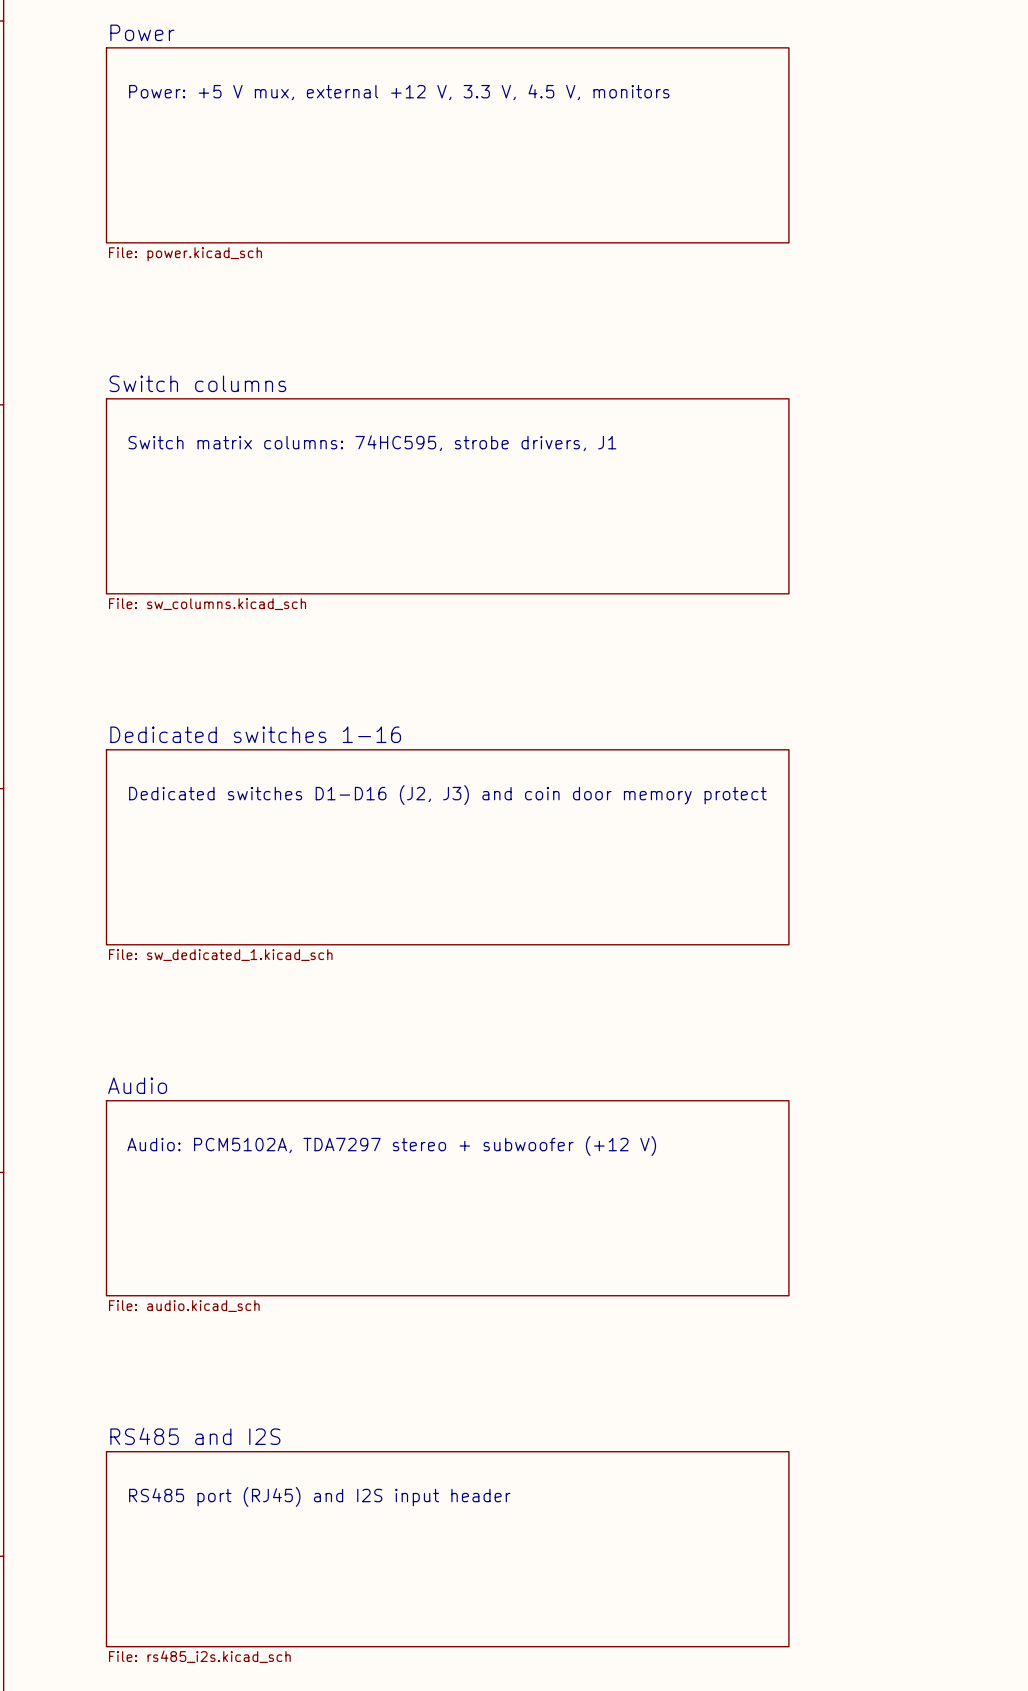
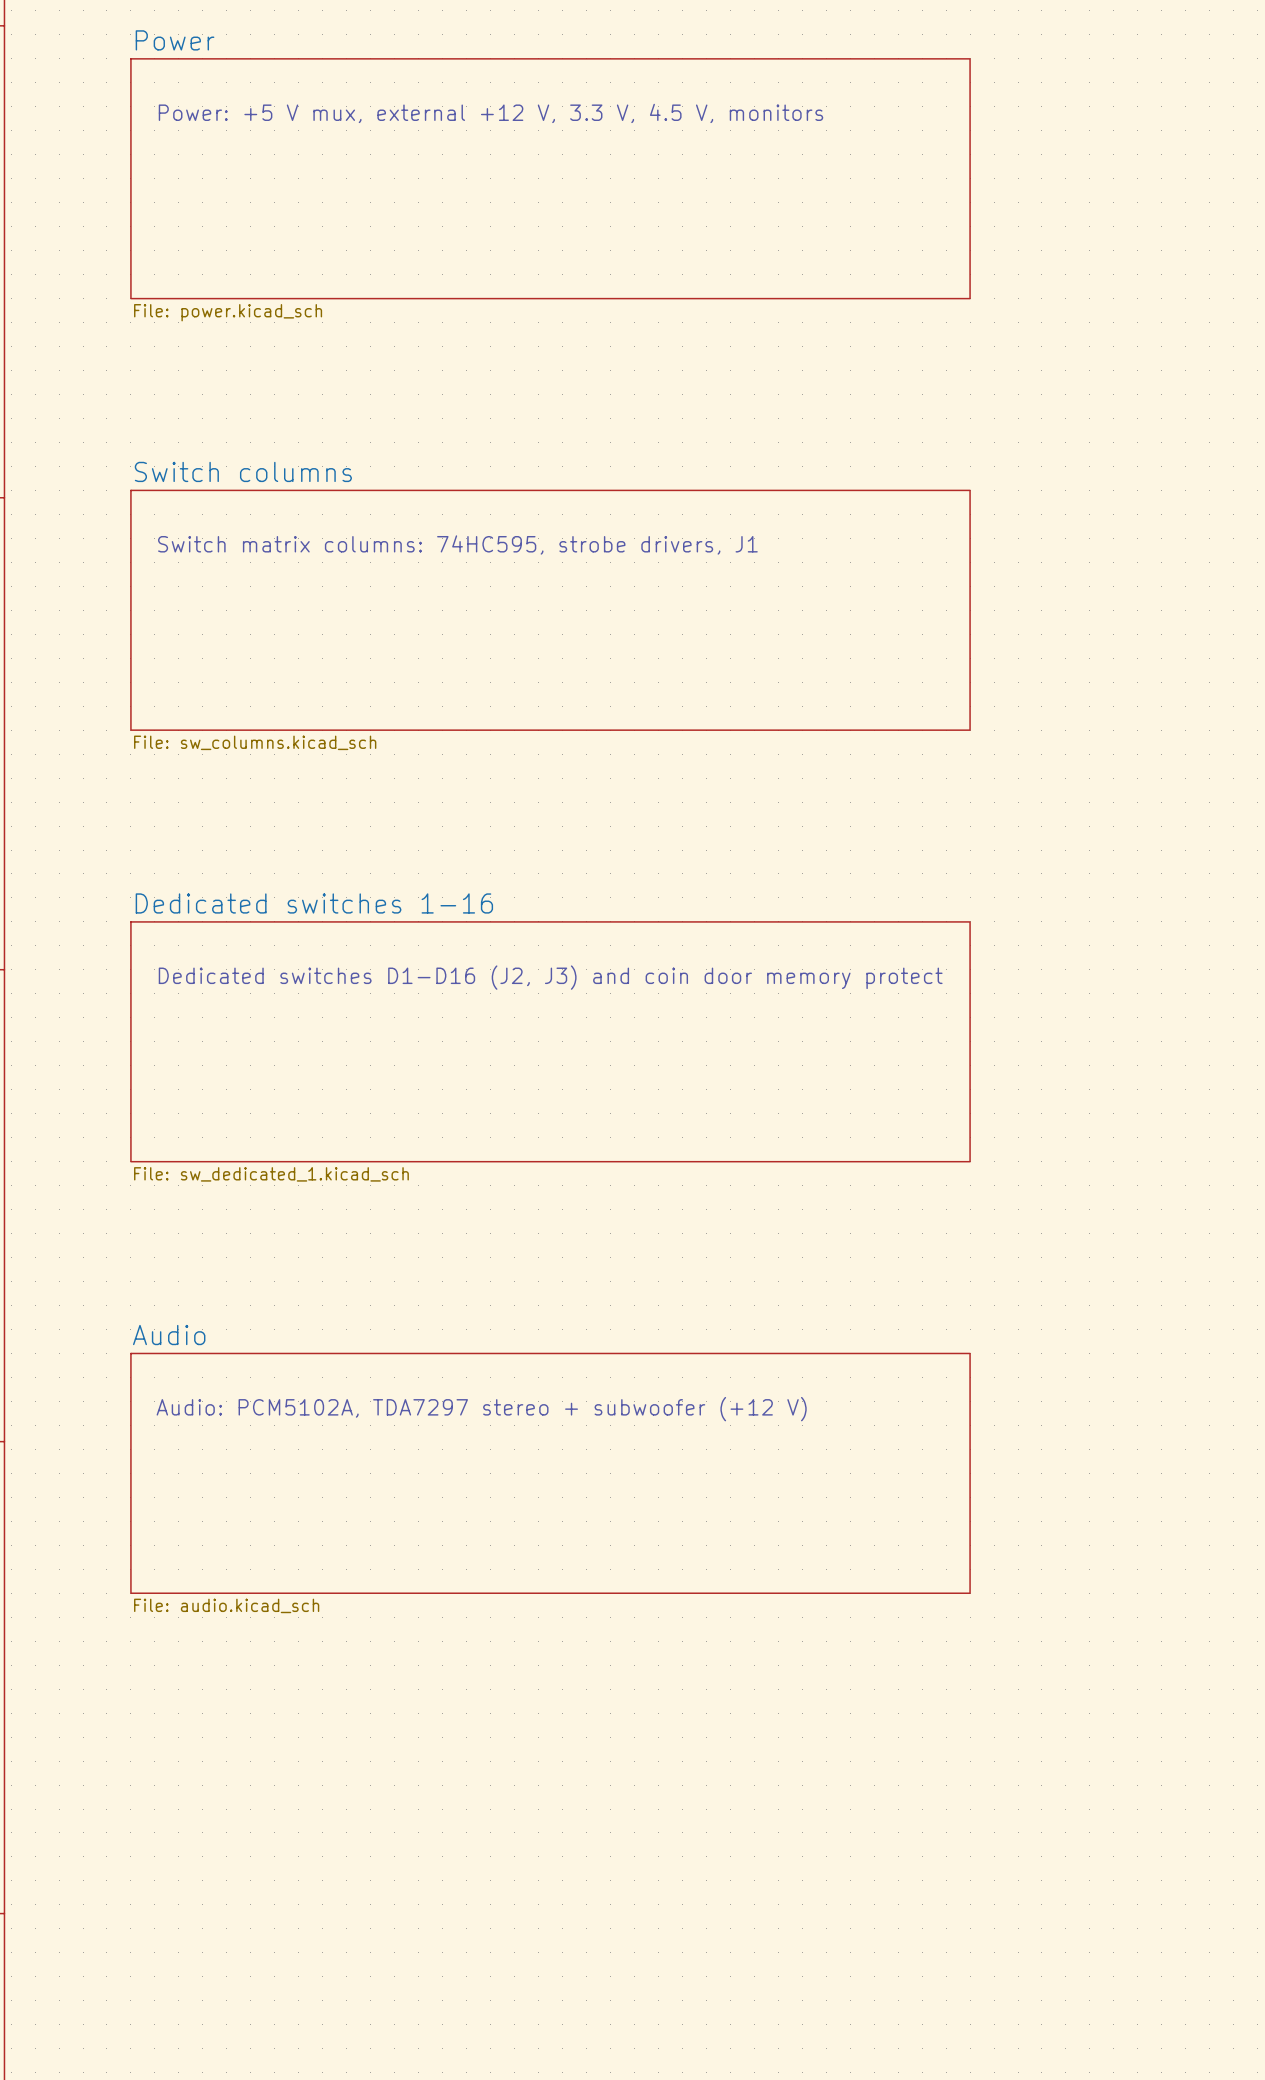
text: RS485 port (RJ45) and I2S input header (319, 1496) -> none
sheet RS485 and I2S: File: rs485_i2s.kicad_sch (447, 1549) -> none

